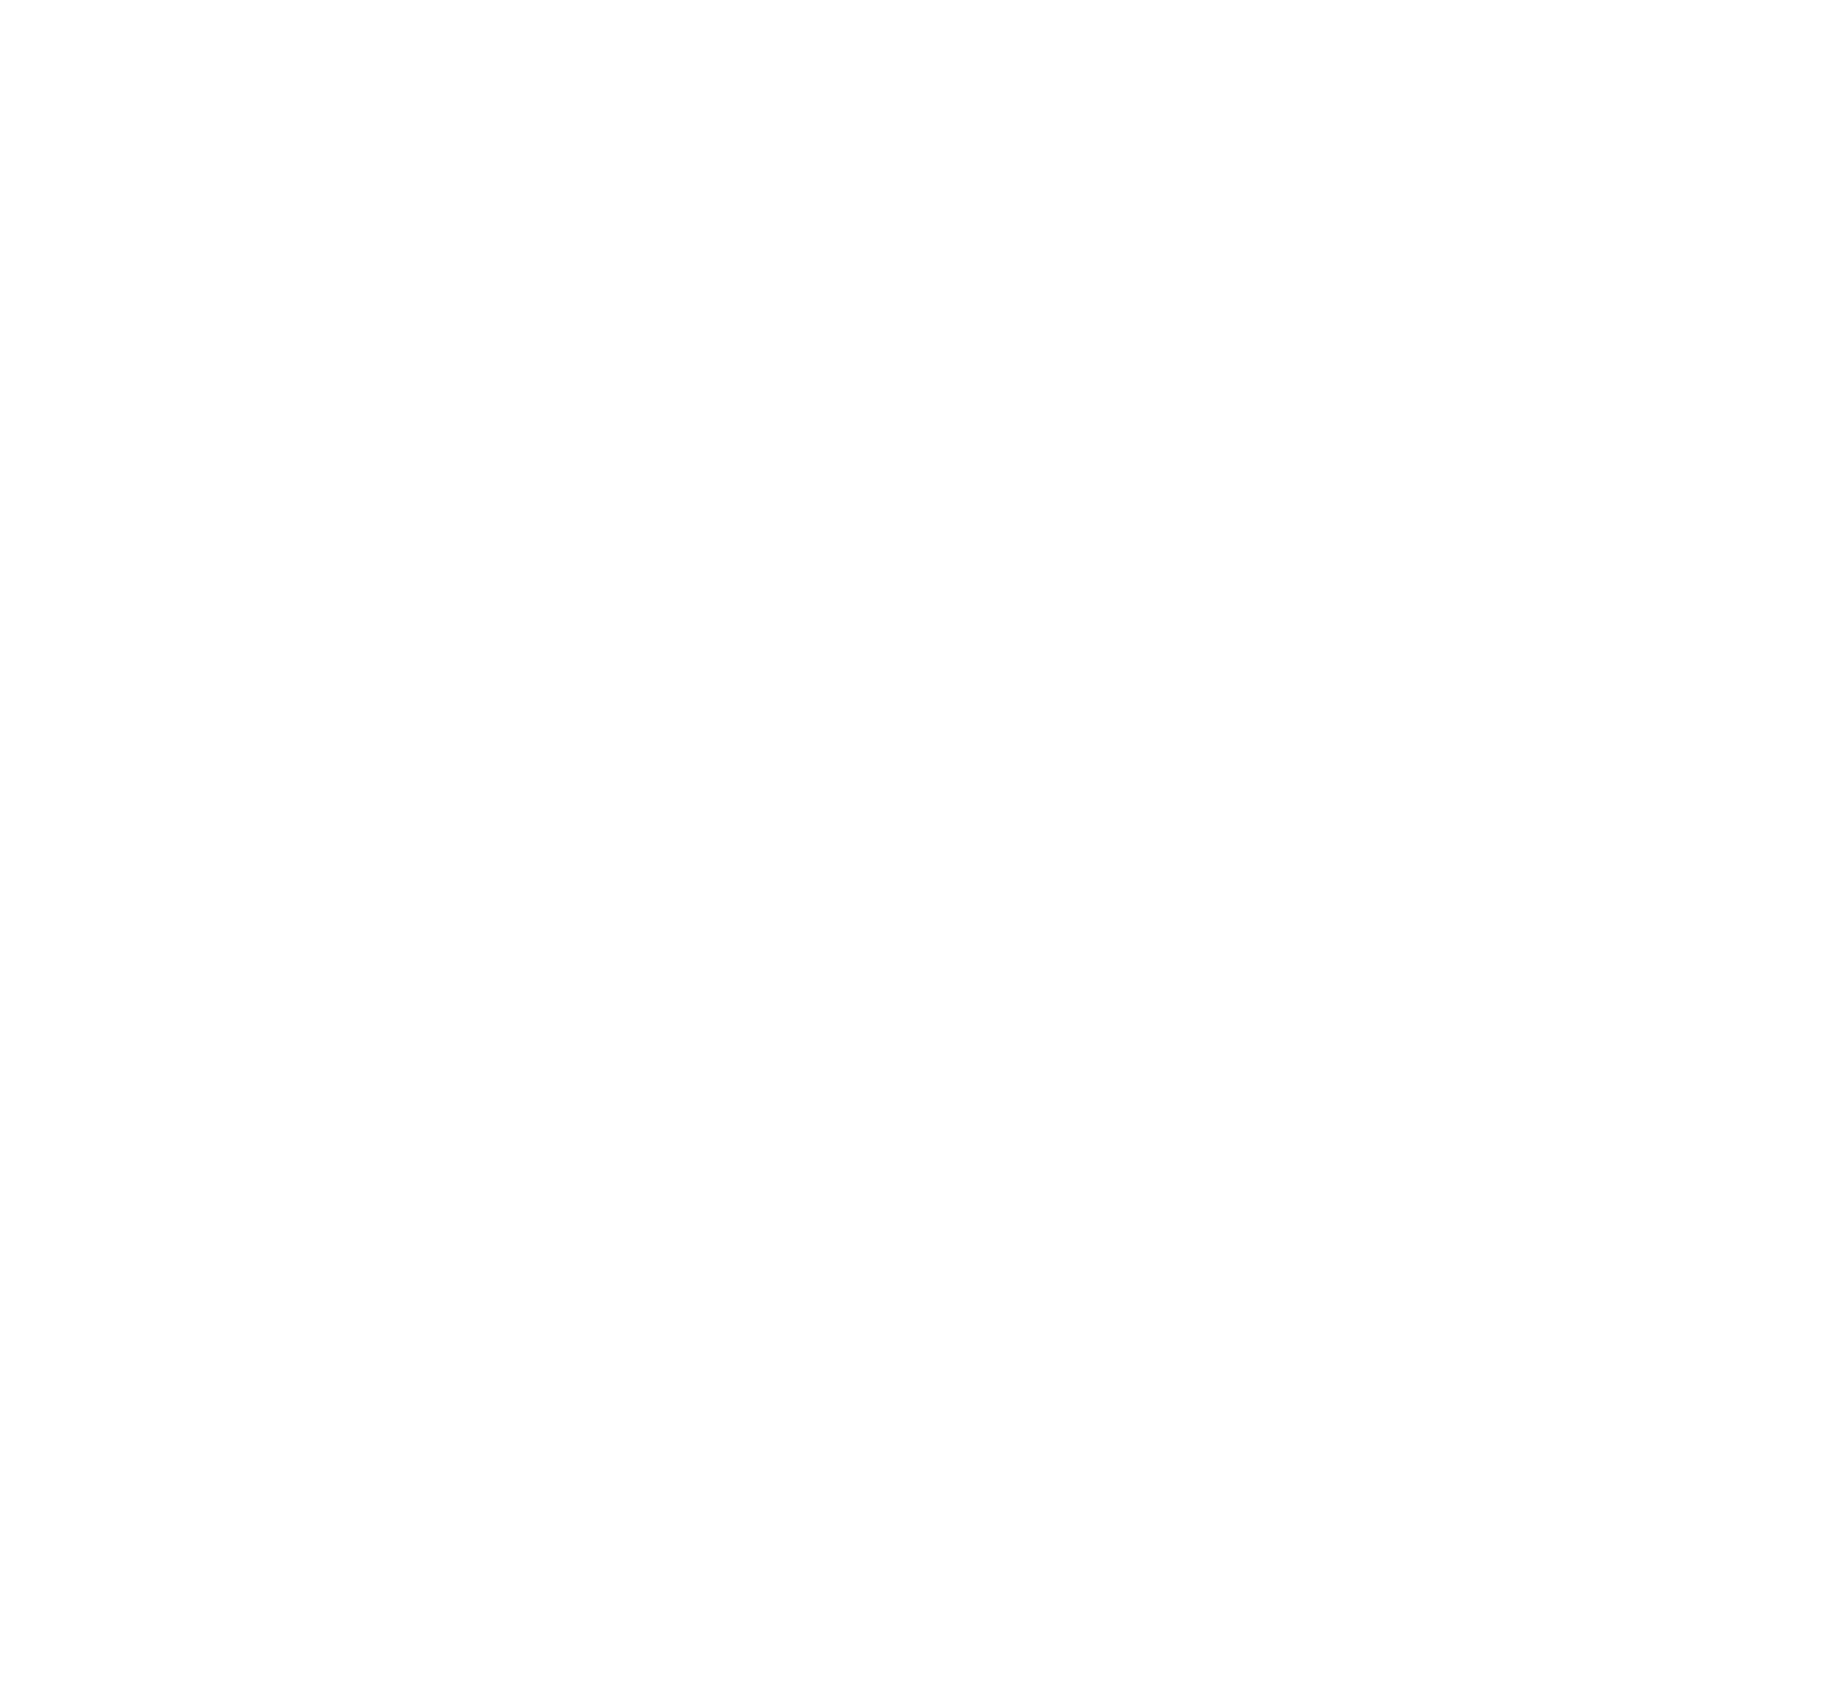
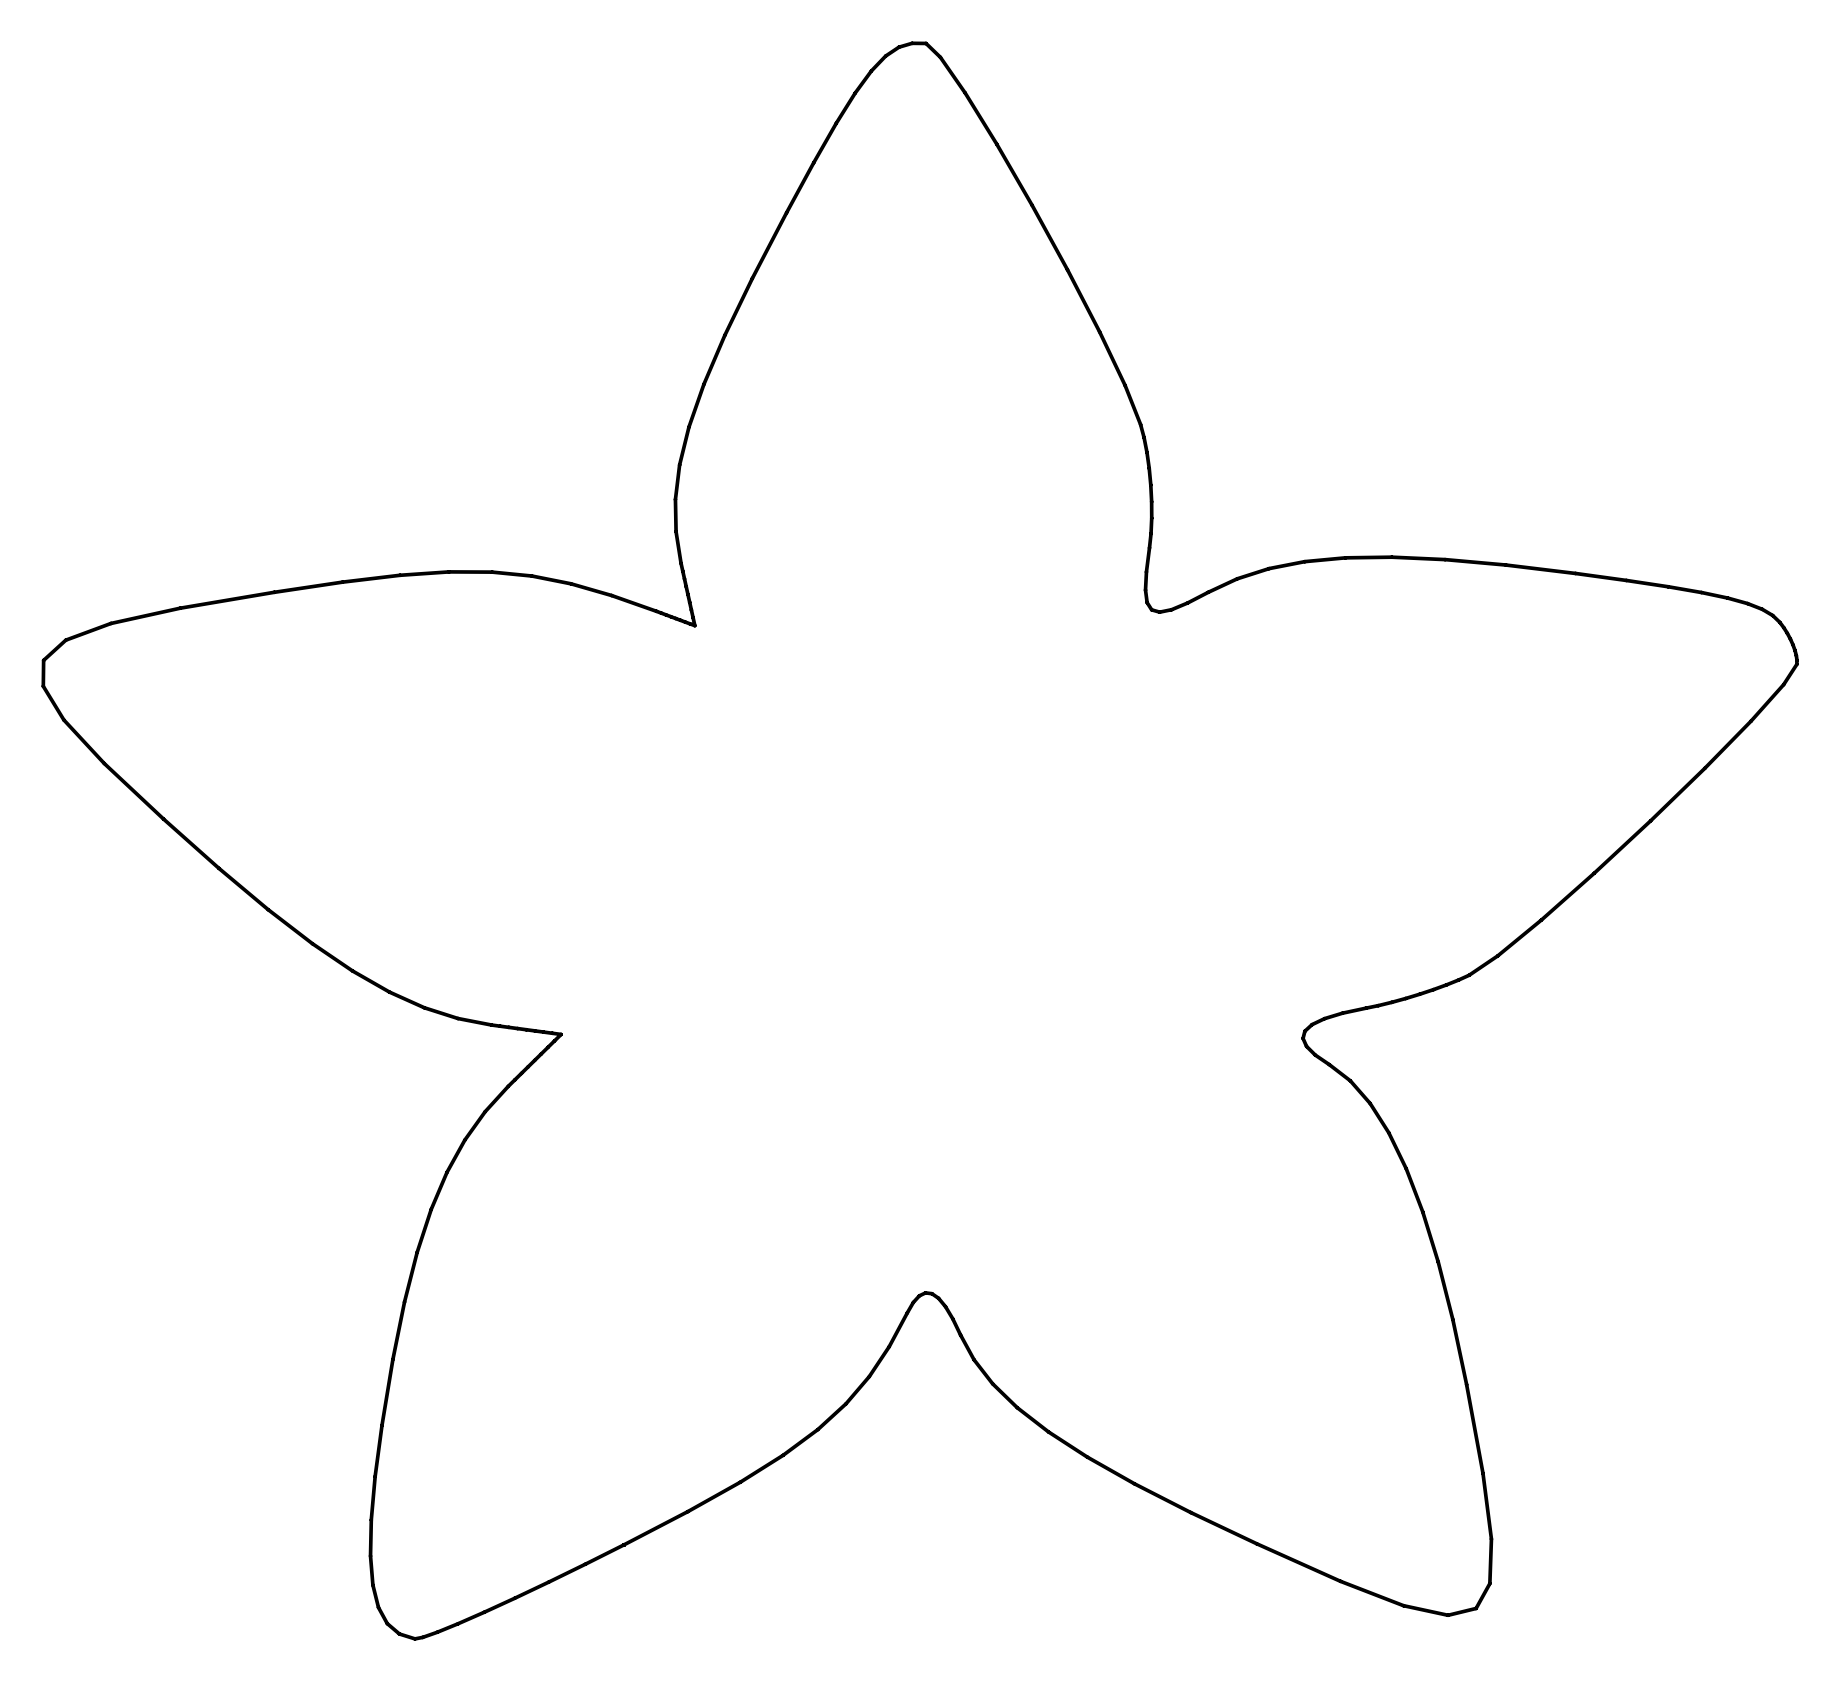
board edge: none -> (912, 43) (899, 47) (885, 56) (871, 71) (836, 123) (752, 278) (703, 384) (688, 427) (679, 465) (675, 499) (676, 531) (694, 625) (611, 595) (570, 583) (531, 576) (492, 572) (448, 571) (342, 582) (180, 608) (111, 623) (65, 640) (43, 660) (43, 686) (63, 719) (104, 763) (218, 868) (312, 943) (352, 970) (389, 992) (424, 1007) (458, 1018) (561, 1034) (508, 1086) (485, 1111) (464, 1140) (447, 1172) (431, 1209) (417, 1252) (392, 1359) (382, 1425) (371, 1519) (370, 1556) (372, 1585) (378, 1607) (387, 1623) (399, 1633) (414, 1638) (422, 1637) (514, 1598) (687, 1511) (783, 1455) (817, 1429) (846, 1403) (869, 1376) (889, 1346) (913, 1302) (919, 1295) (925, 1292) (931, 1293) (945, 1306) (974, 1359) (992, 1383) (1017, 1407) (1048, 1431) (1087, 1457) (1190, 1512) (1340, 1581) (1403, 1605) (1448, 1615) (1476, 1608) (1489, 1583) (1491, 1539) (1482, 1473) (1466, 1384) (1438, 1262) (1422, 1211) (1406, 1168) (1388, 1132) (1370, 1103) (1350, 1080) (1306, 1046) (1303, 1038) (1304, 1031) (1312, 1024) (1324, 1018) (1405, 998) (1446, 984) (1469, 975) (1497, 955) (1594, 873) (1704, 768) (1783, 684) (1796, 664) (1792, 644) (1779, 622) (1762, 609) (1747, 603) (1701, 592) (1626, 580) (1505, 565) (1445, 559) (1345, 557) (1304, 561) (1269, 568) (1237, 578) (1171, 609) (1159, 612) (1151, 609) (1147, 602) (1145, 590) (1151, 518) (1149, 468) (1140, 424) (1125, 385) (1067, 269) (996, 144) (965, 92) (940, 57) (926, 43) (912, 43)

